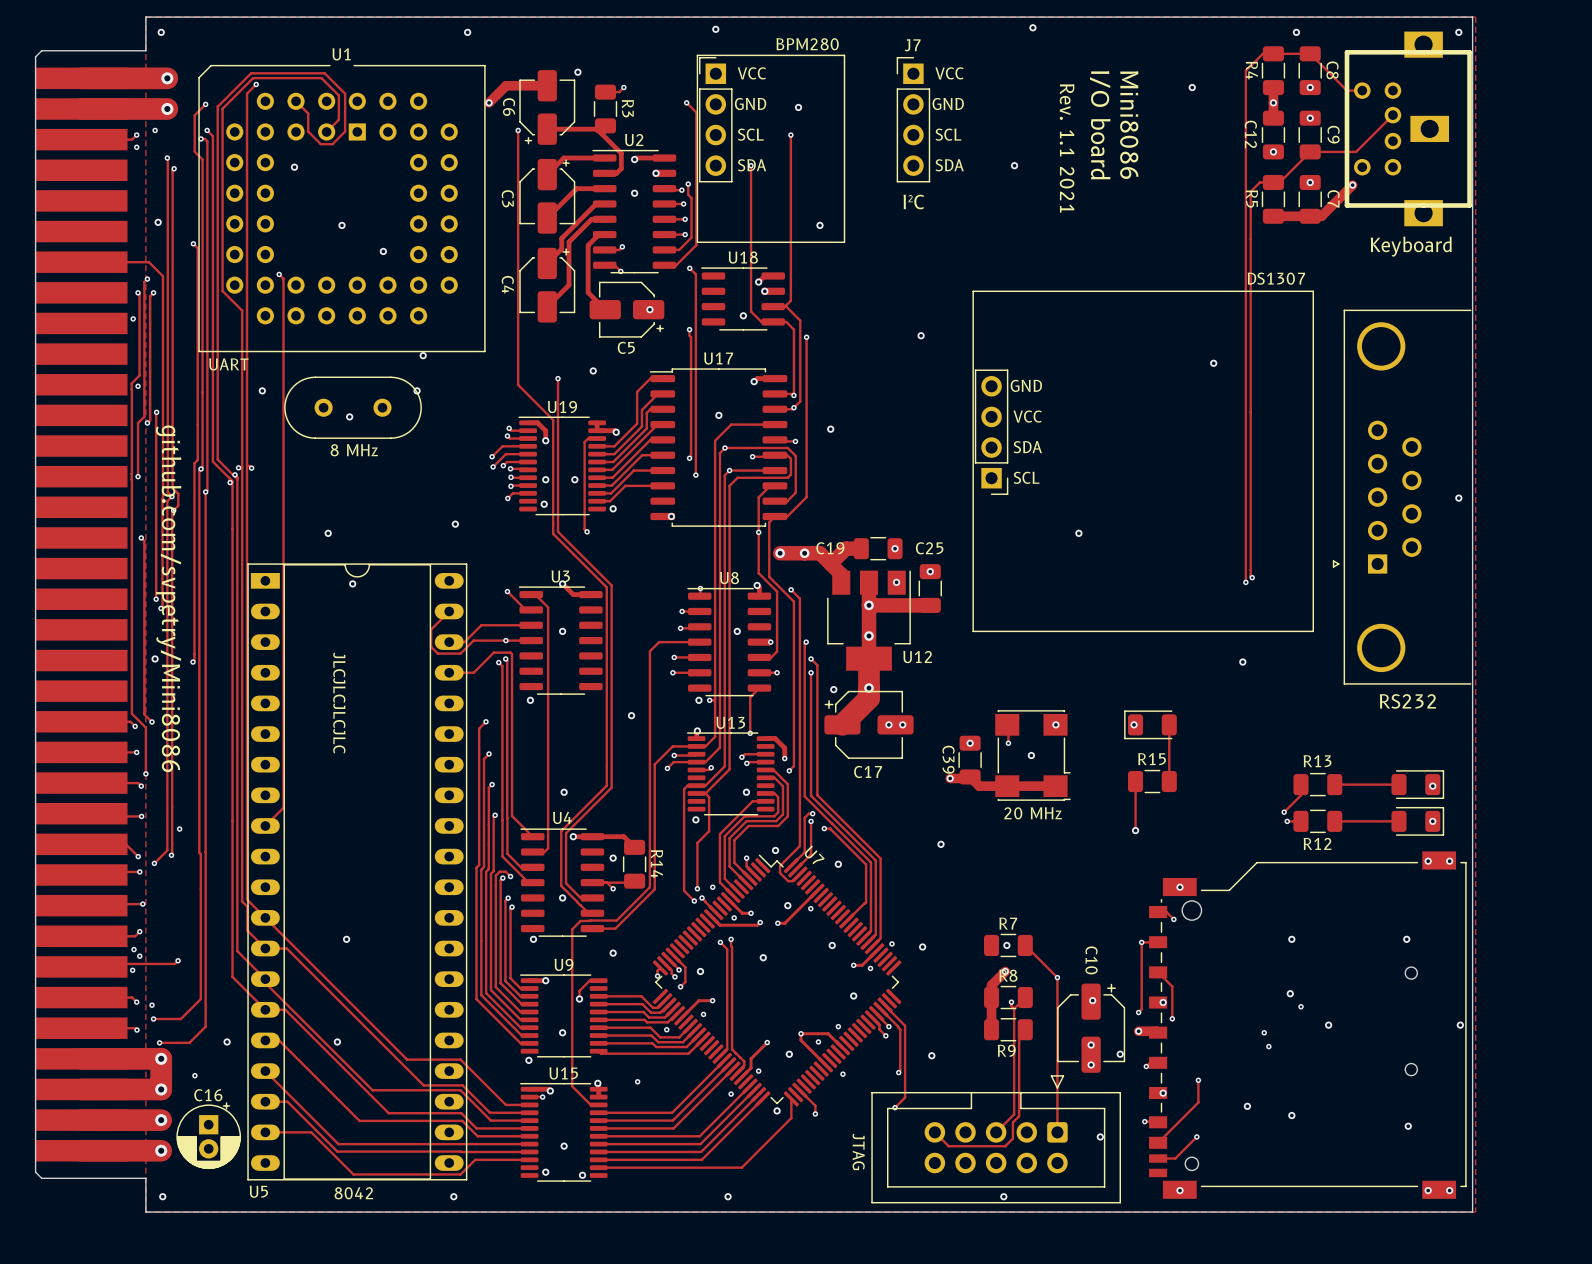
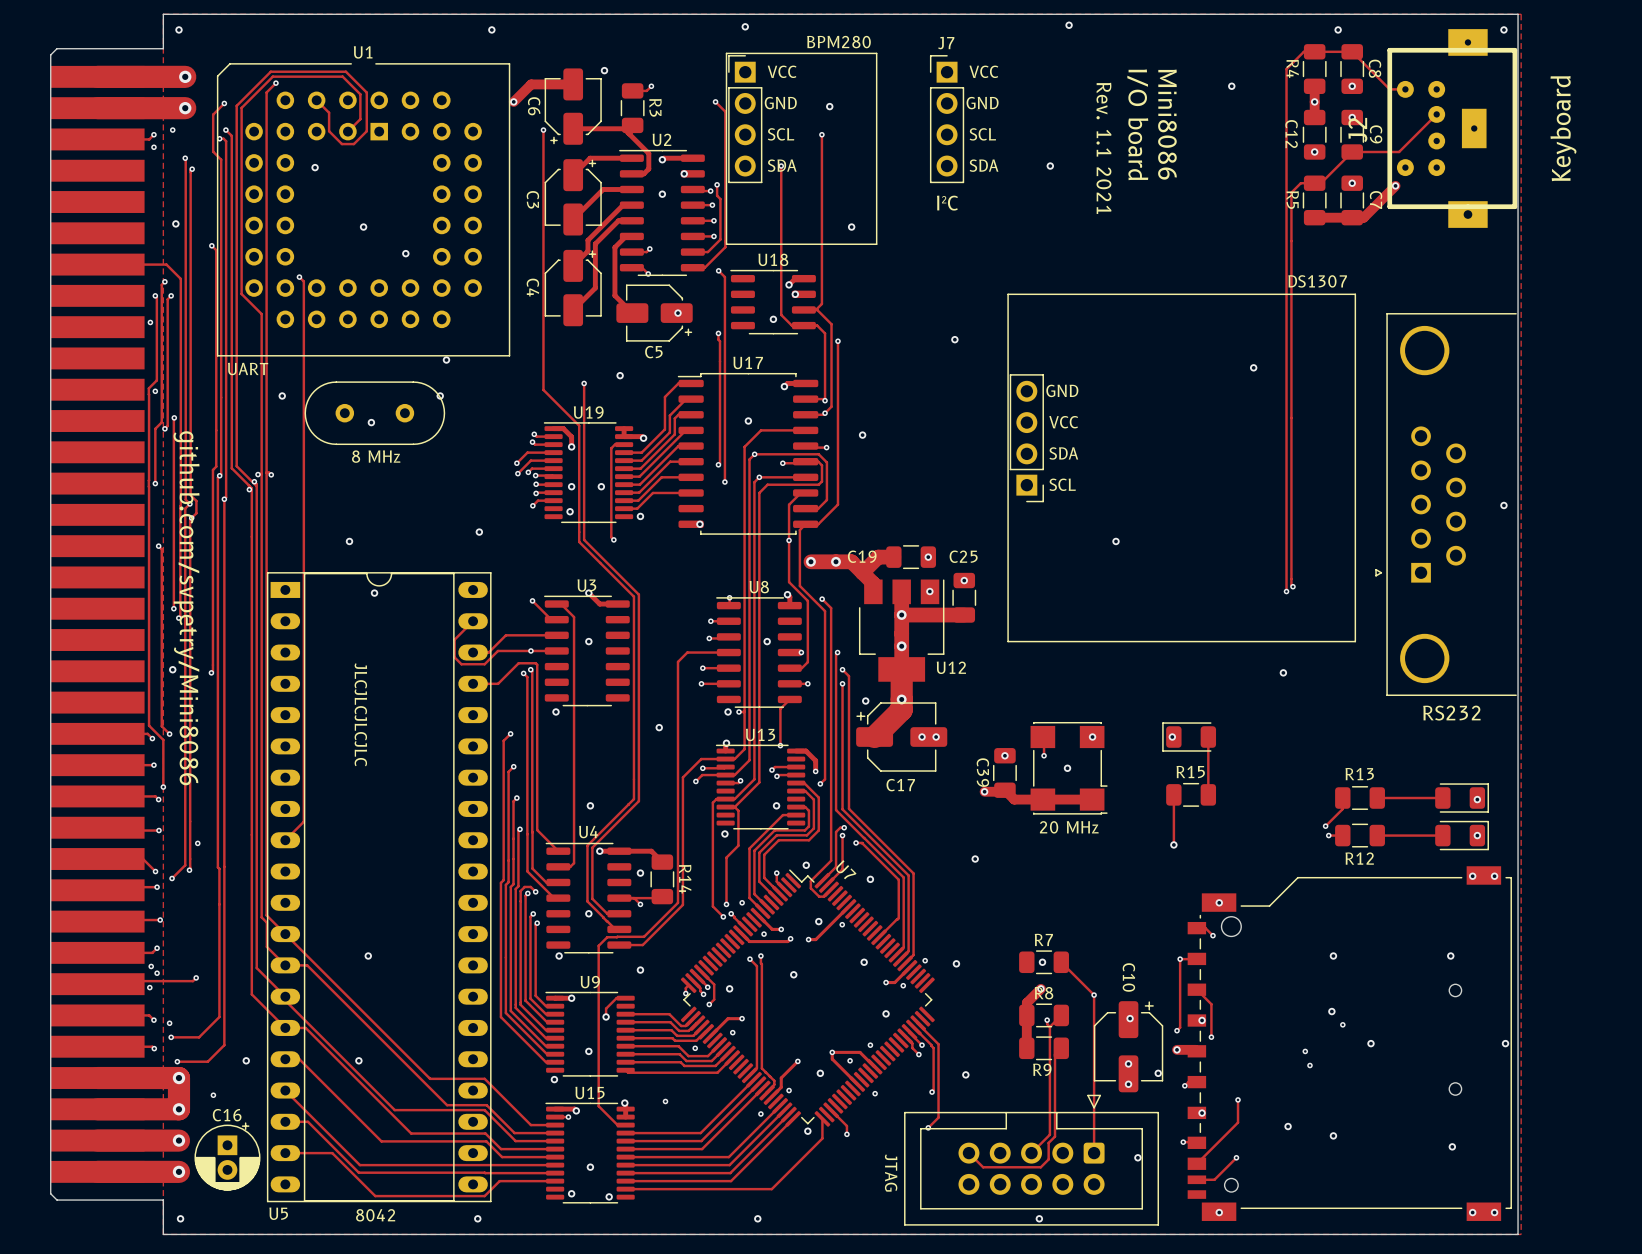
part: Keyboard (1408, 128) -> none
J2: none -> Keyboard (1452, 128)

